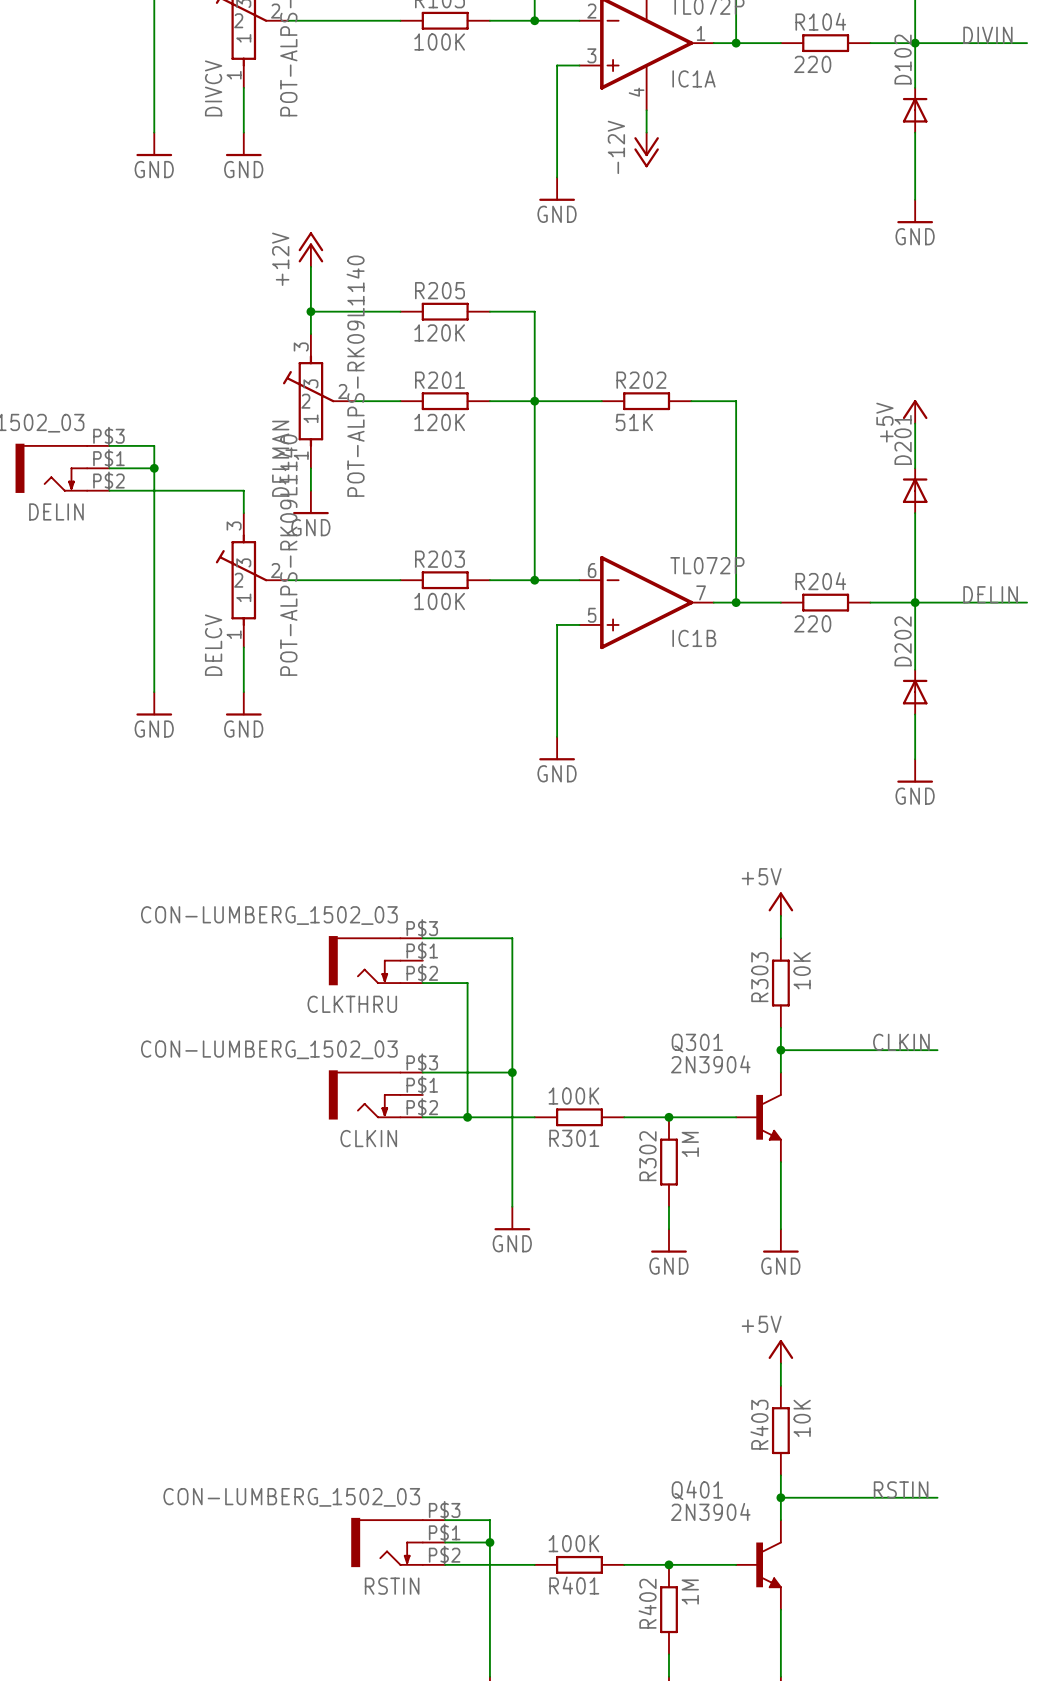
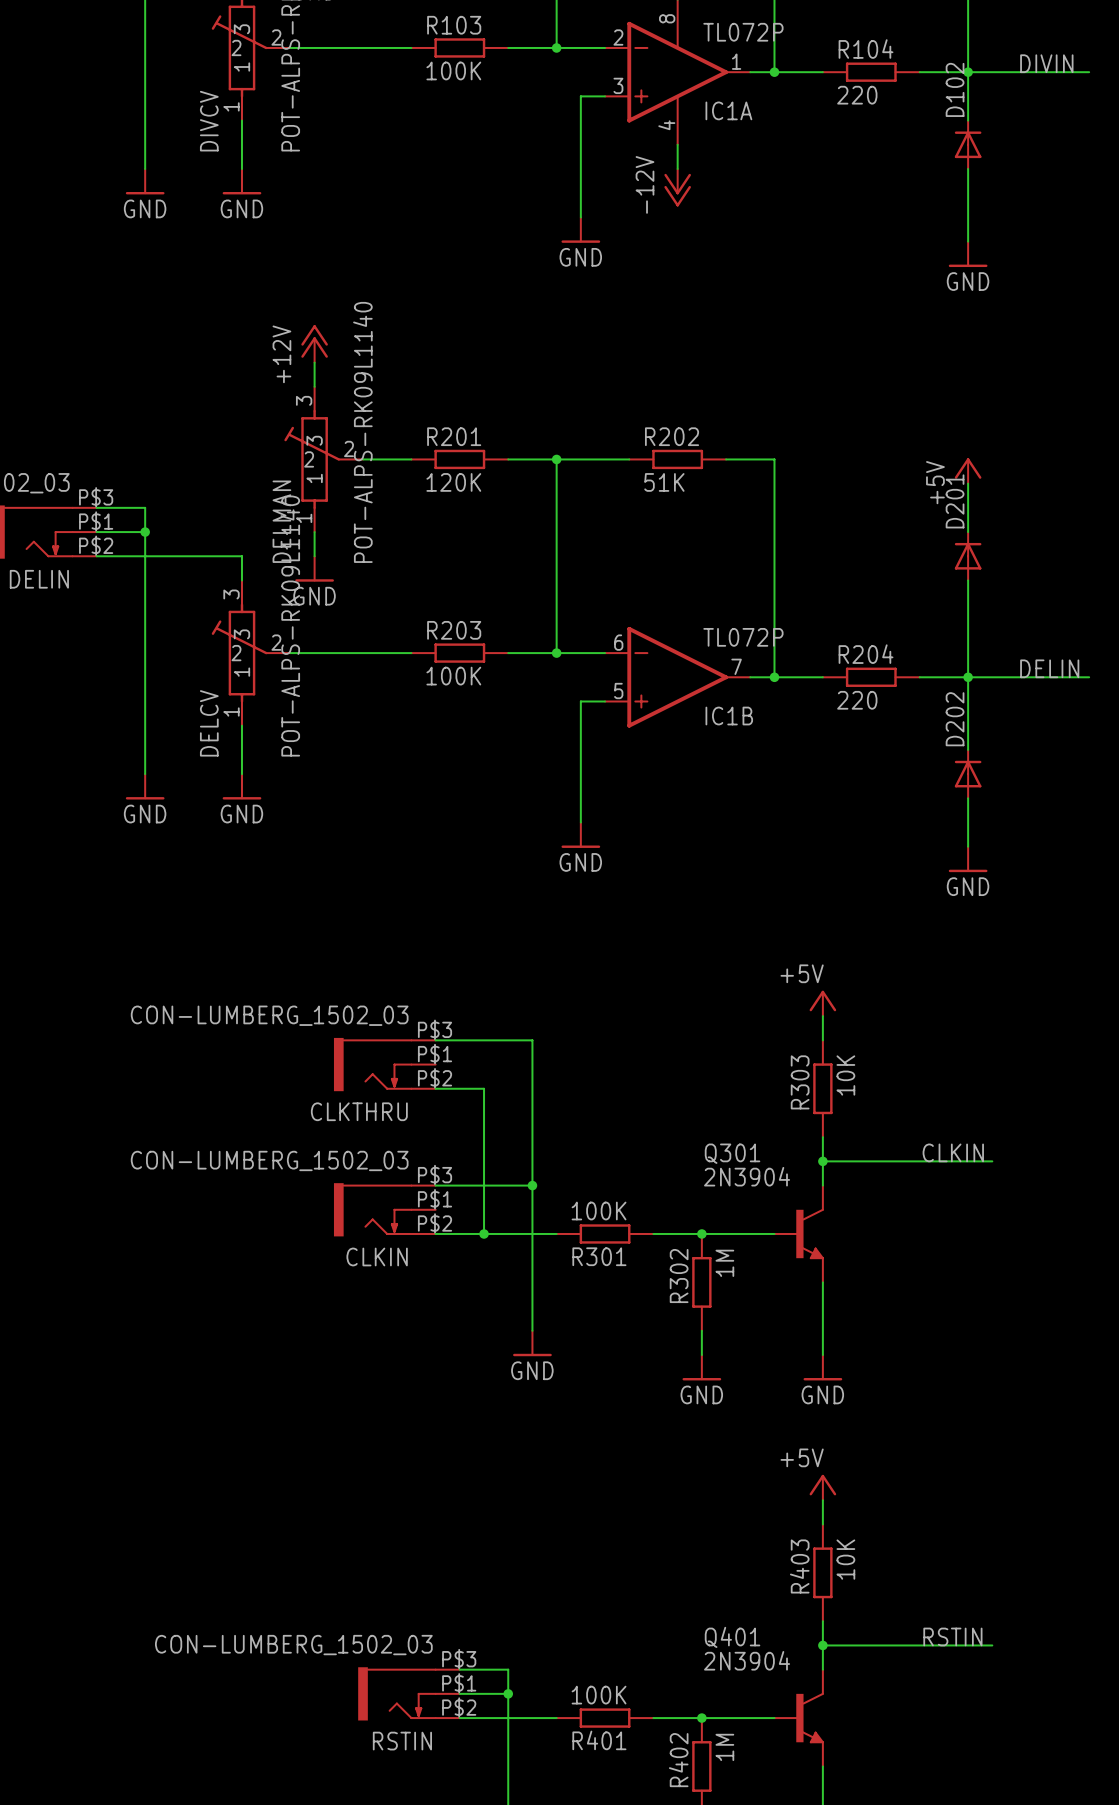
power symbol position: +12V (310, 249) -> +12V (314, 343)
wire: (310, 266) (310, 311) (400, 311) -> none
junction: (310, 311) -> none
R205: 120K (445, 311) -> none
wire: (489, 311) (534, 311) (534, 401) -> none

